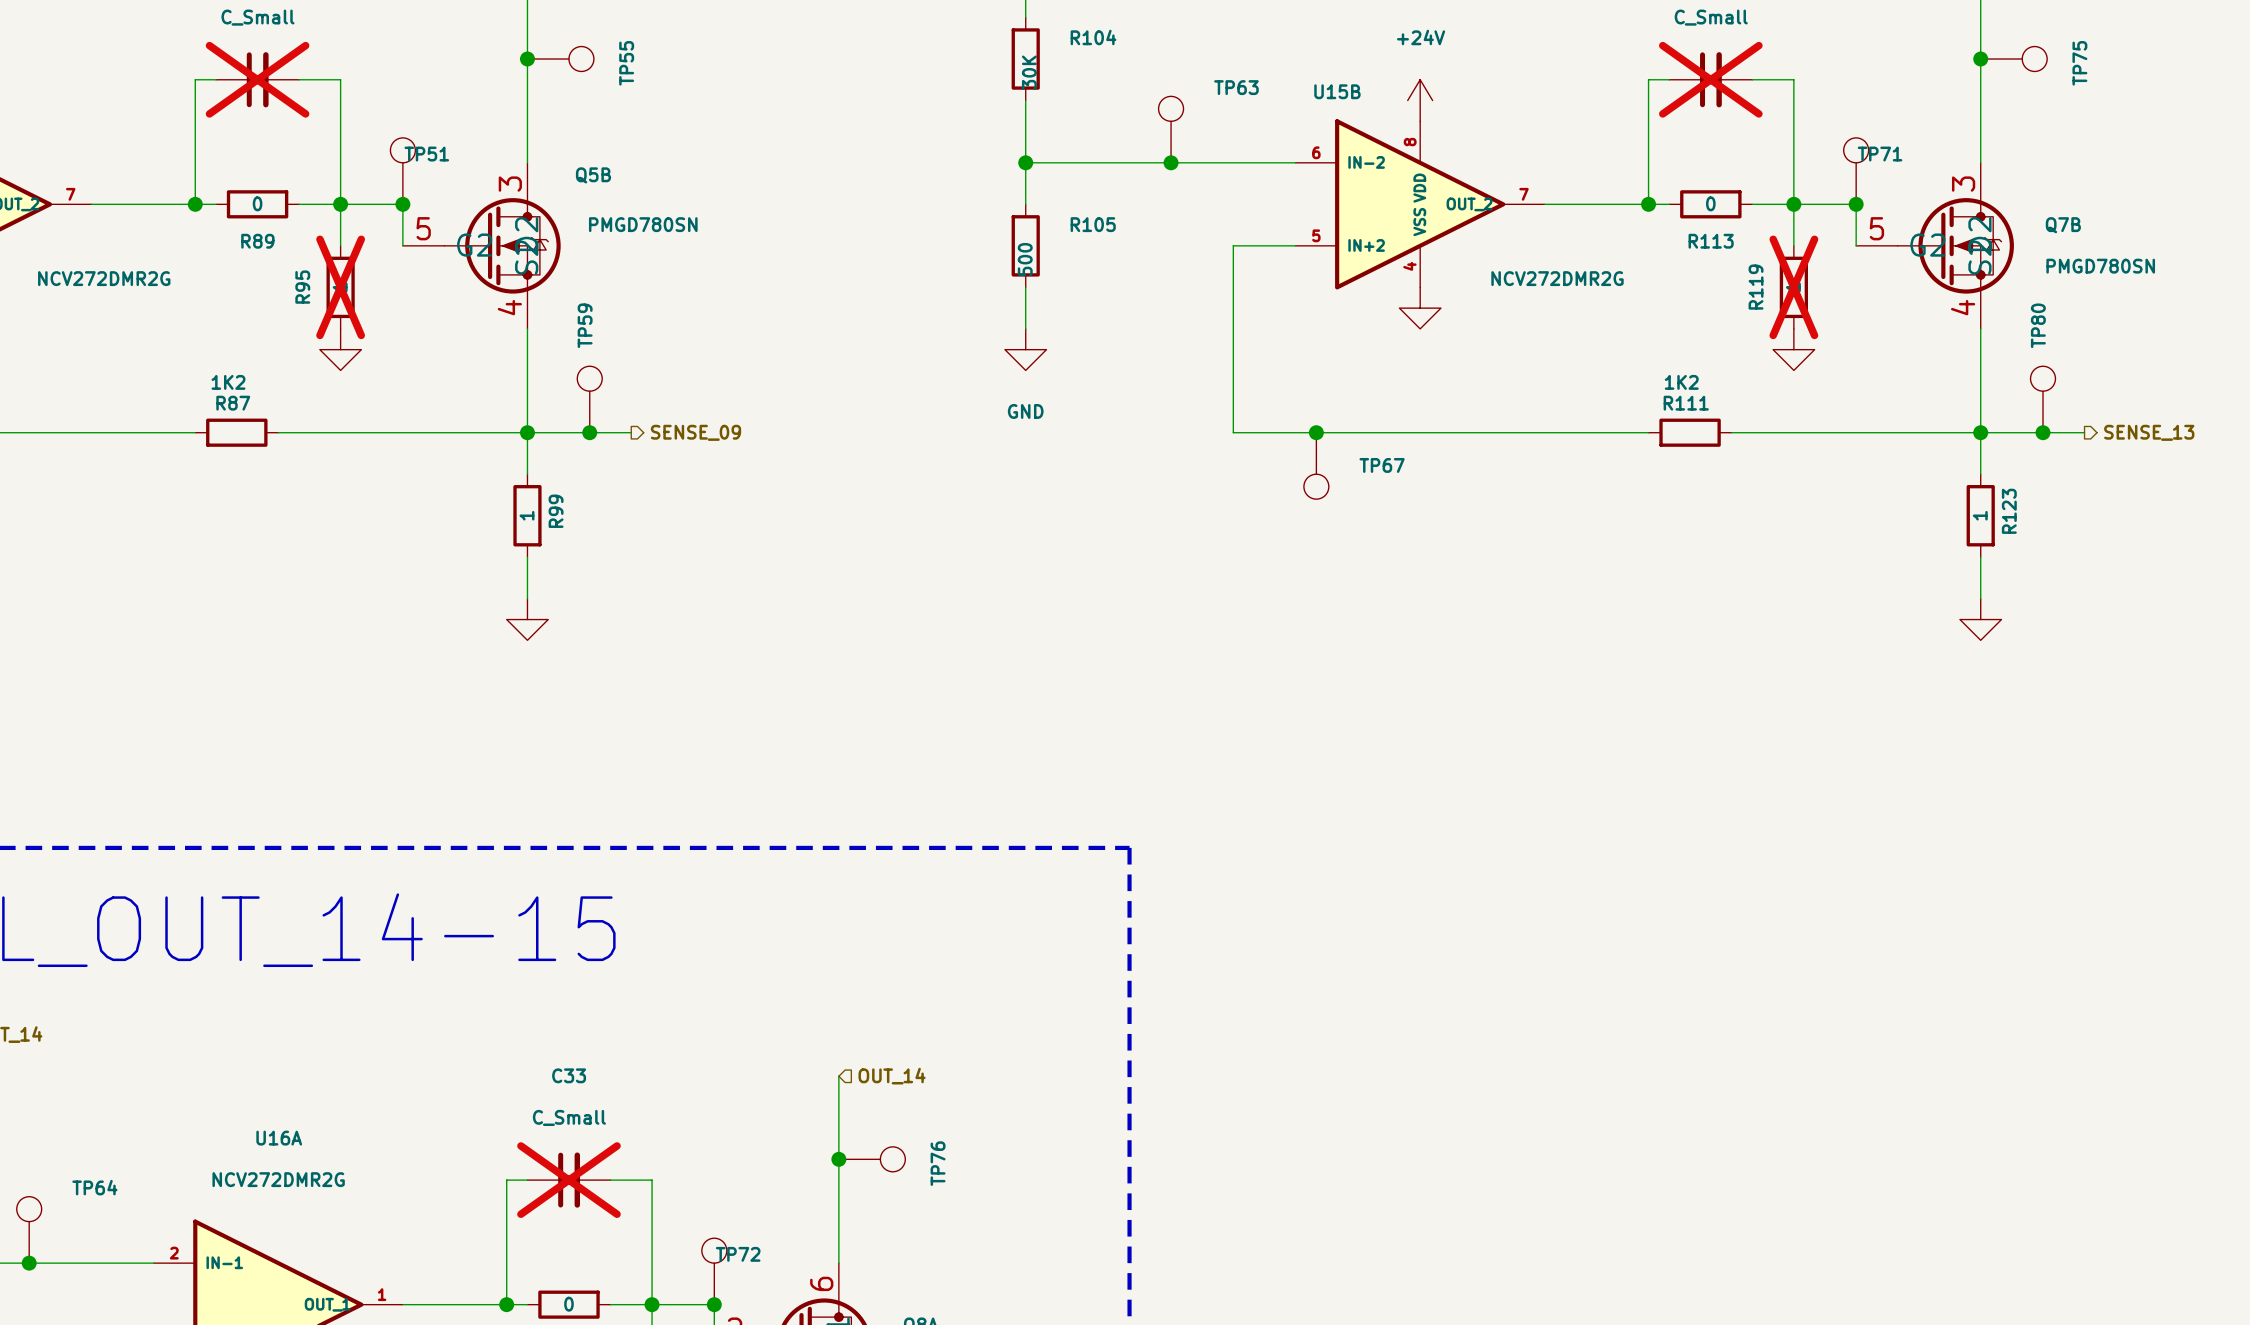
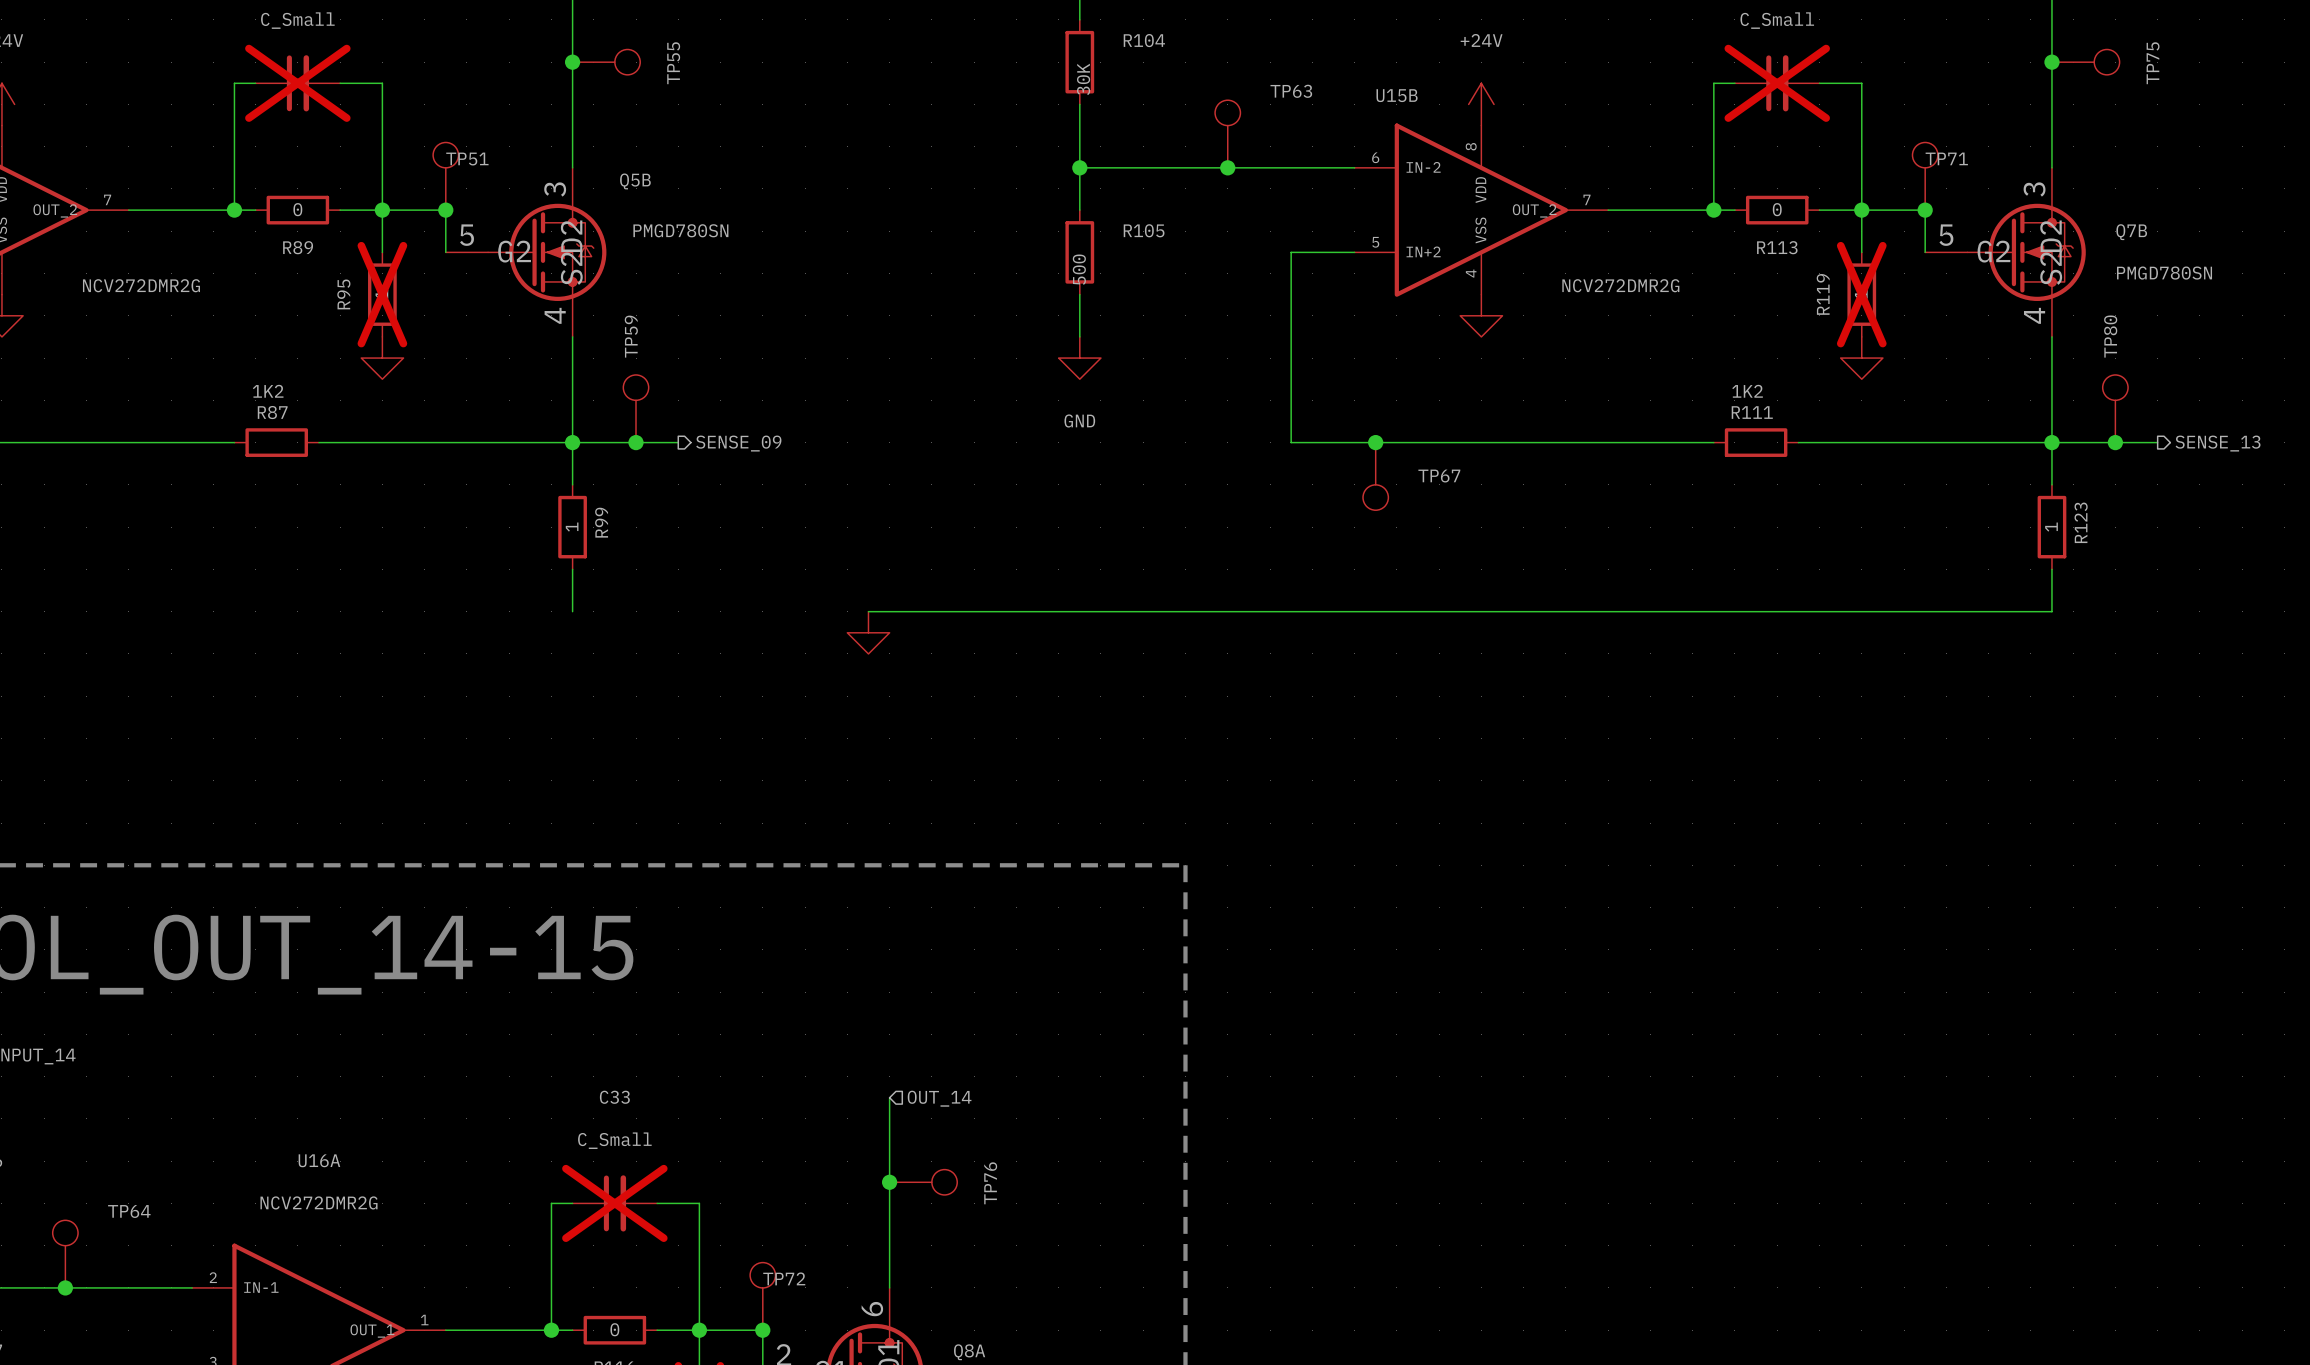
wire: none -> (868, 611) (2051, 611)
power symbol position: (527, 619) -> (868, 632)
power symbol: (1980, 619) -> none

